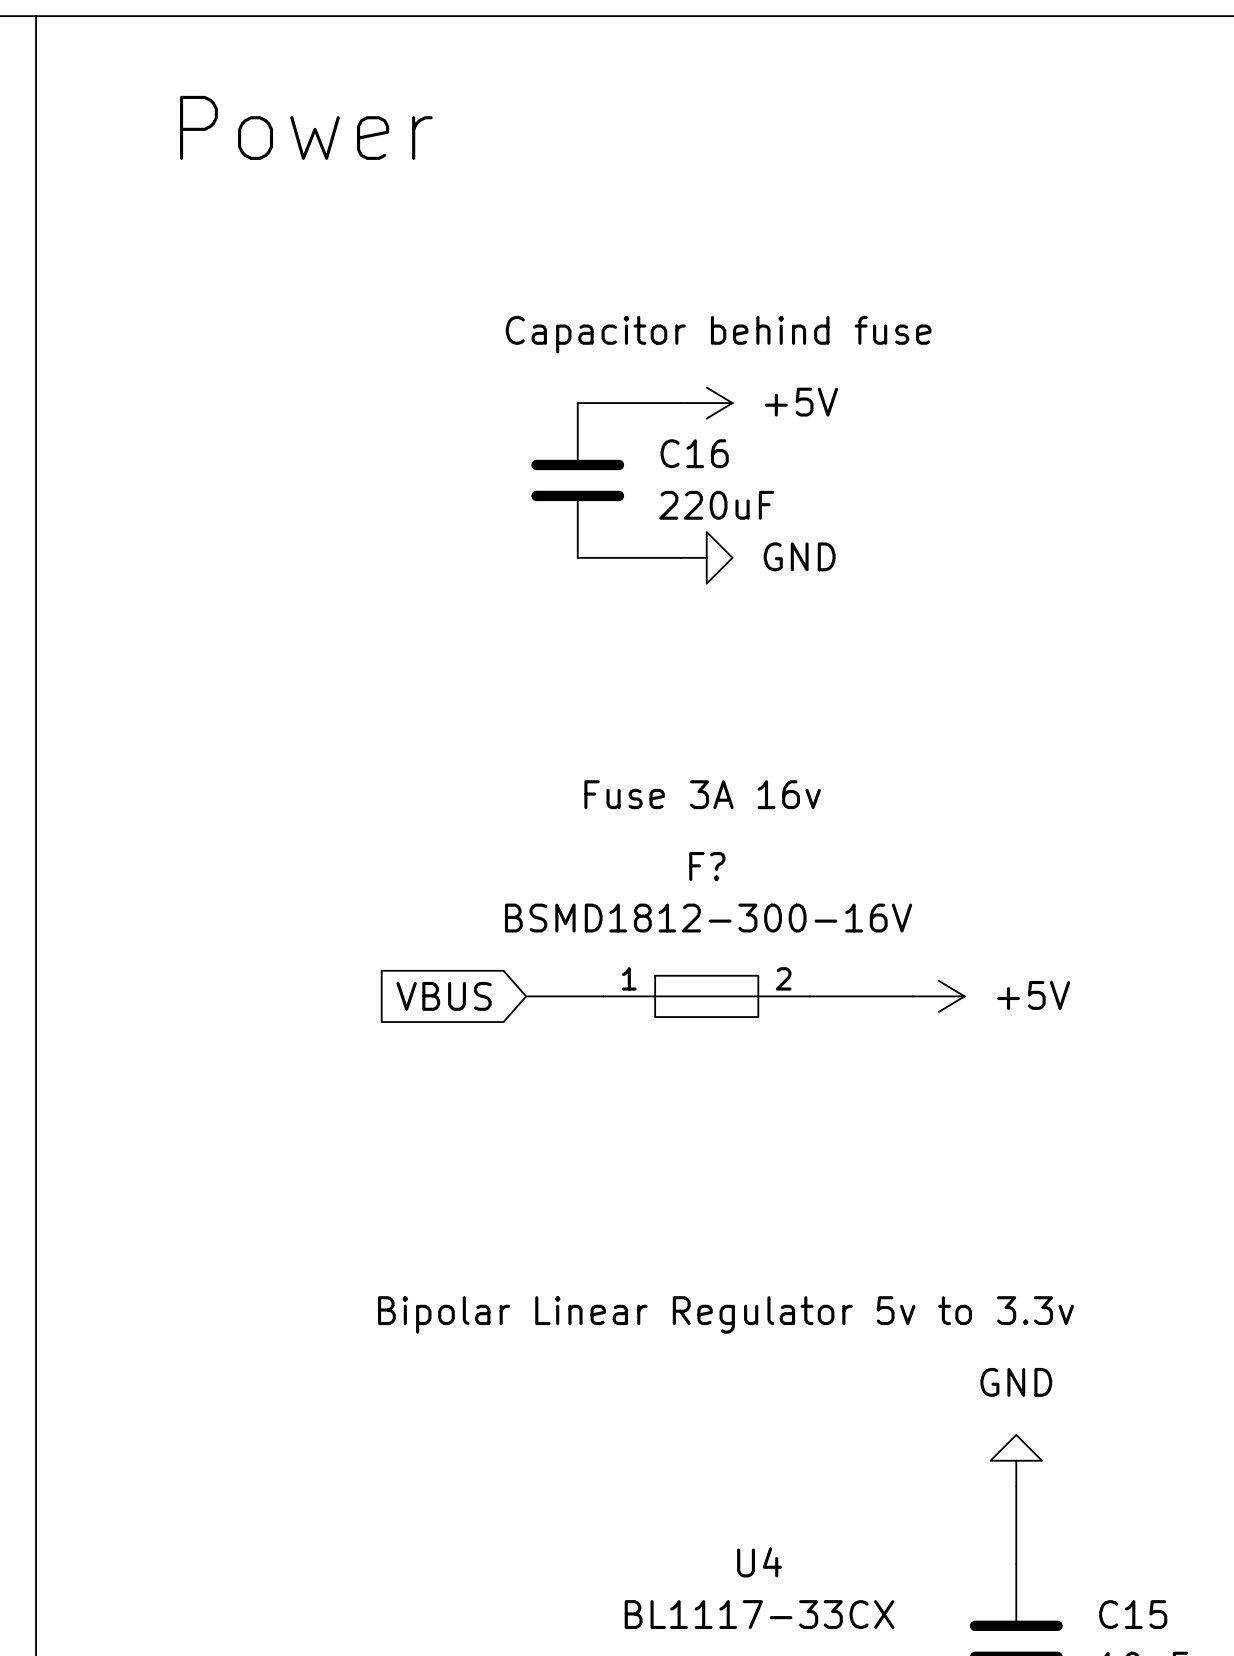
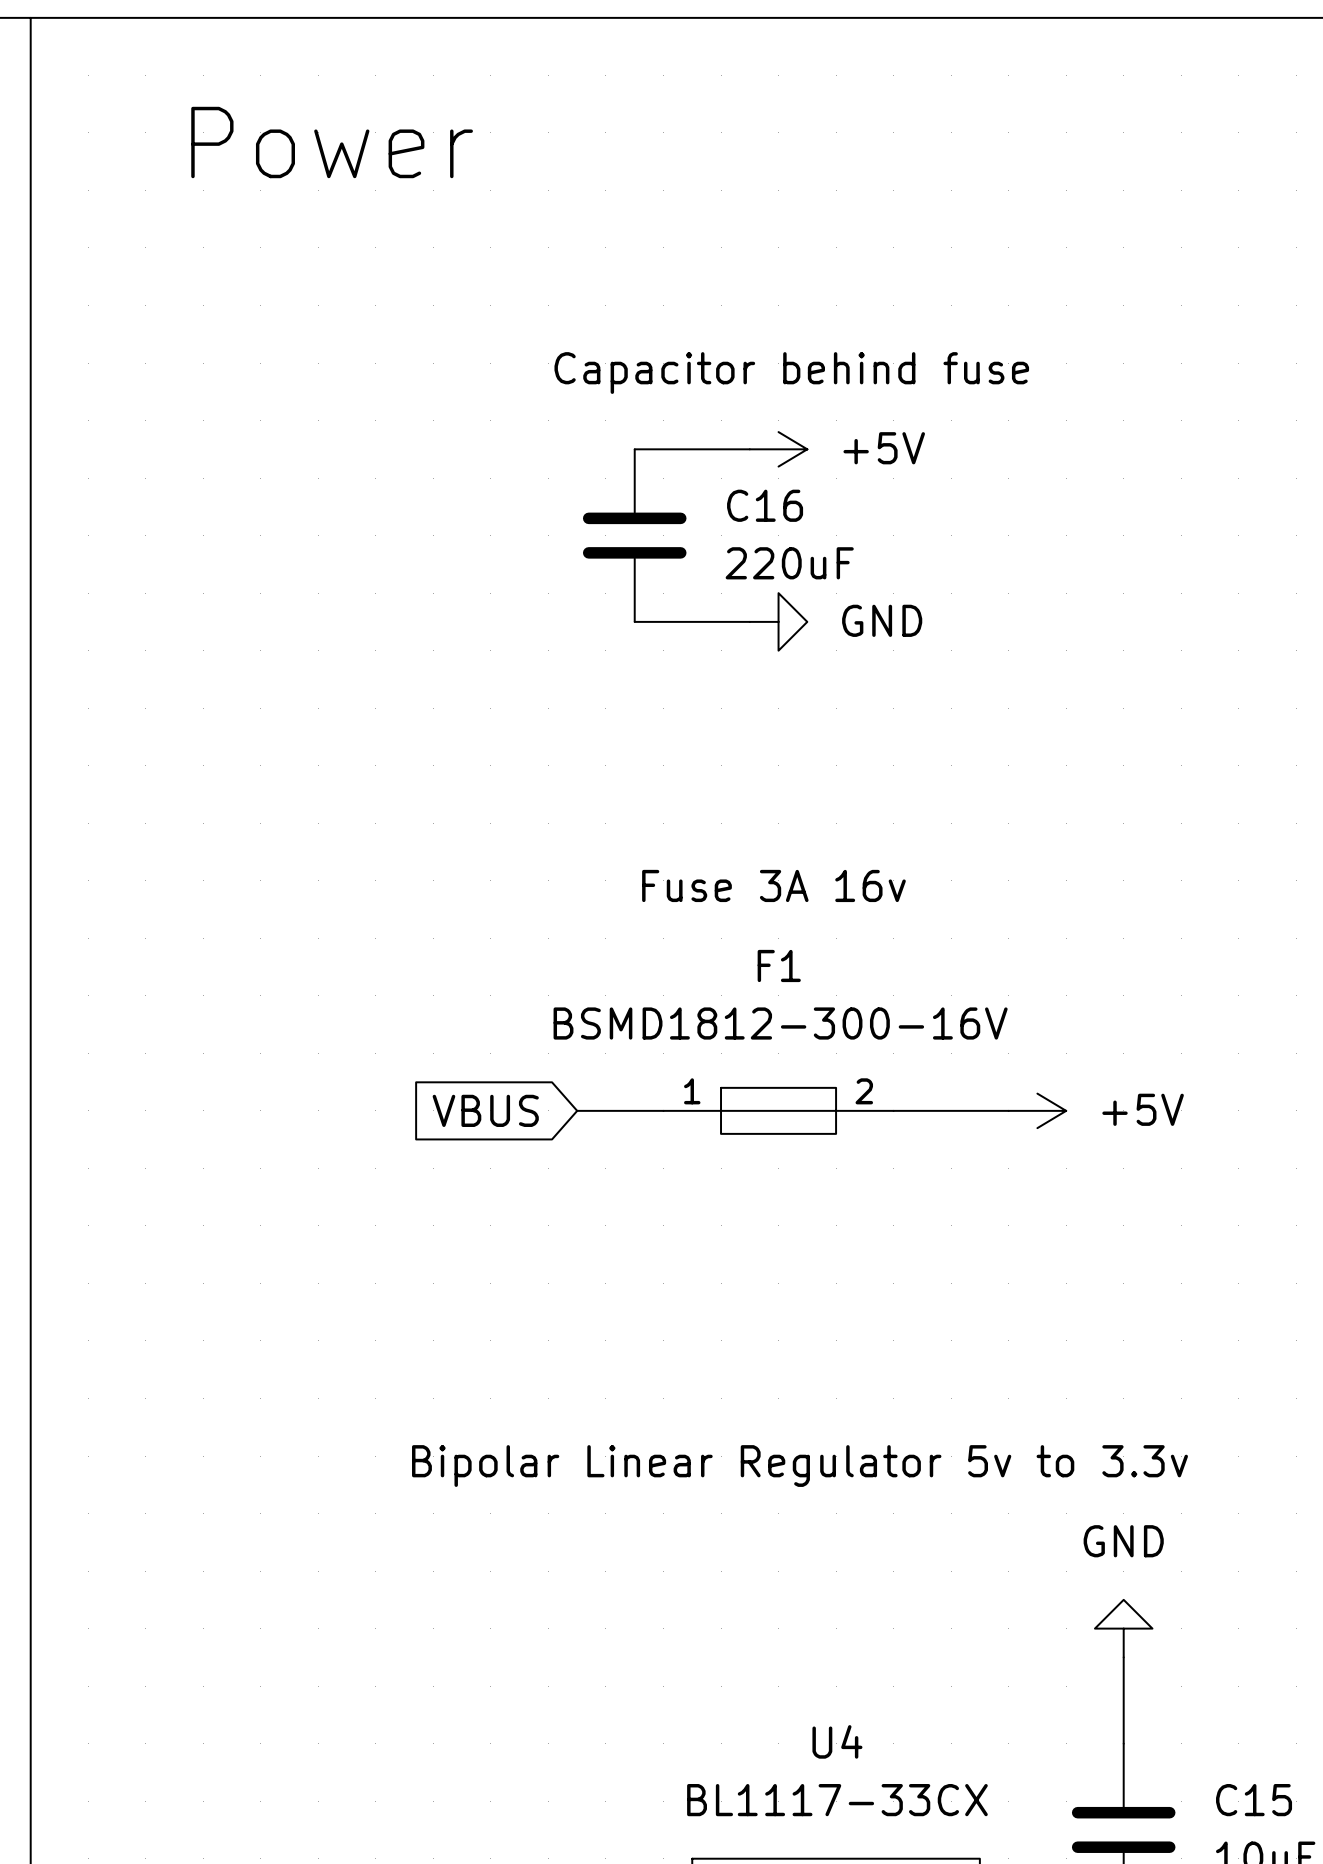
F? name: F? (707, 866) -> F1 (779, 965)

